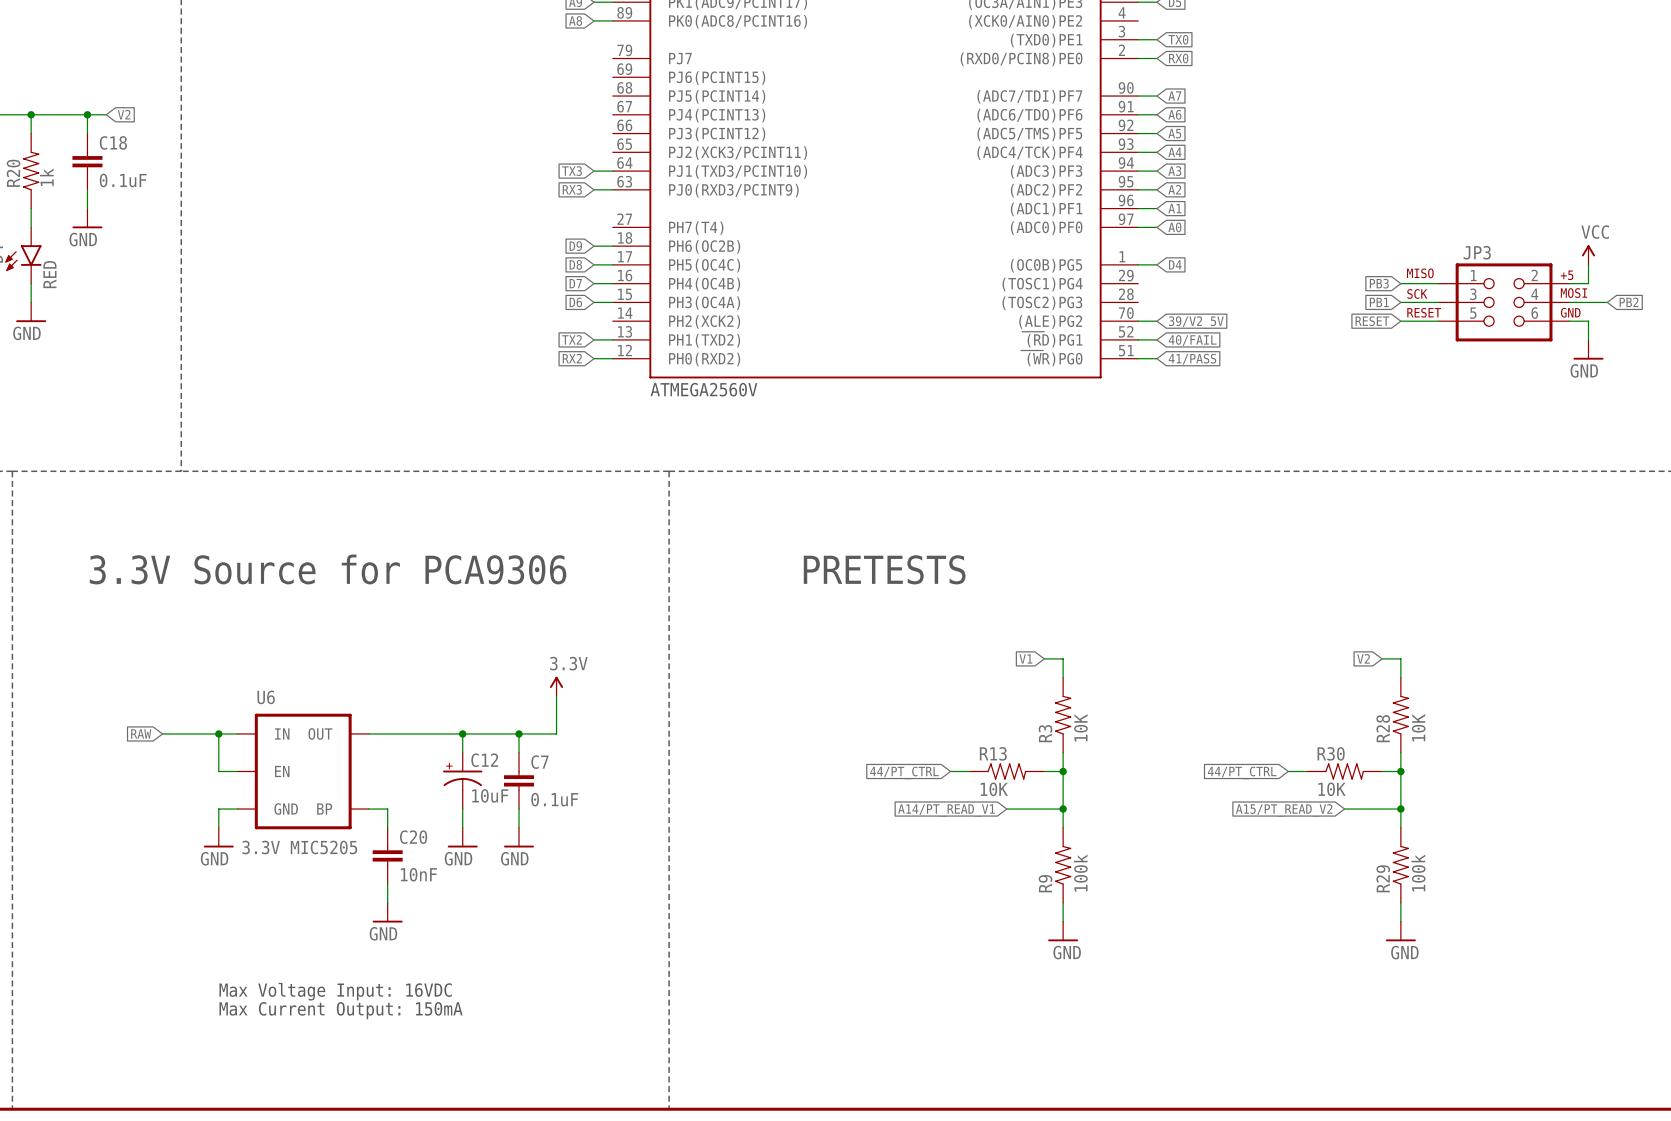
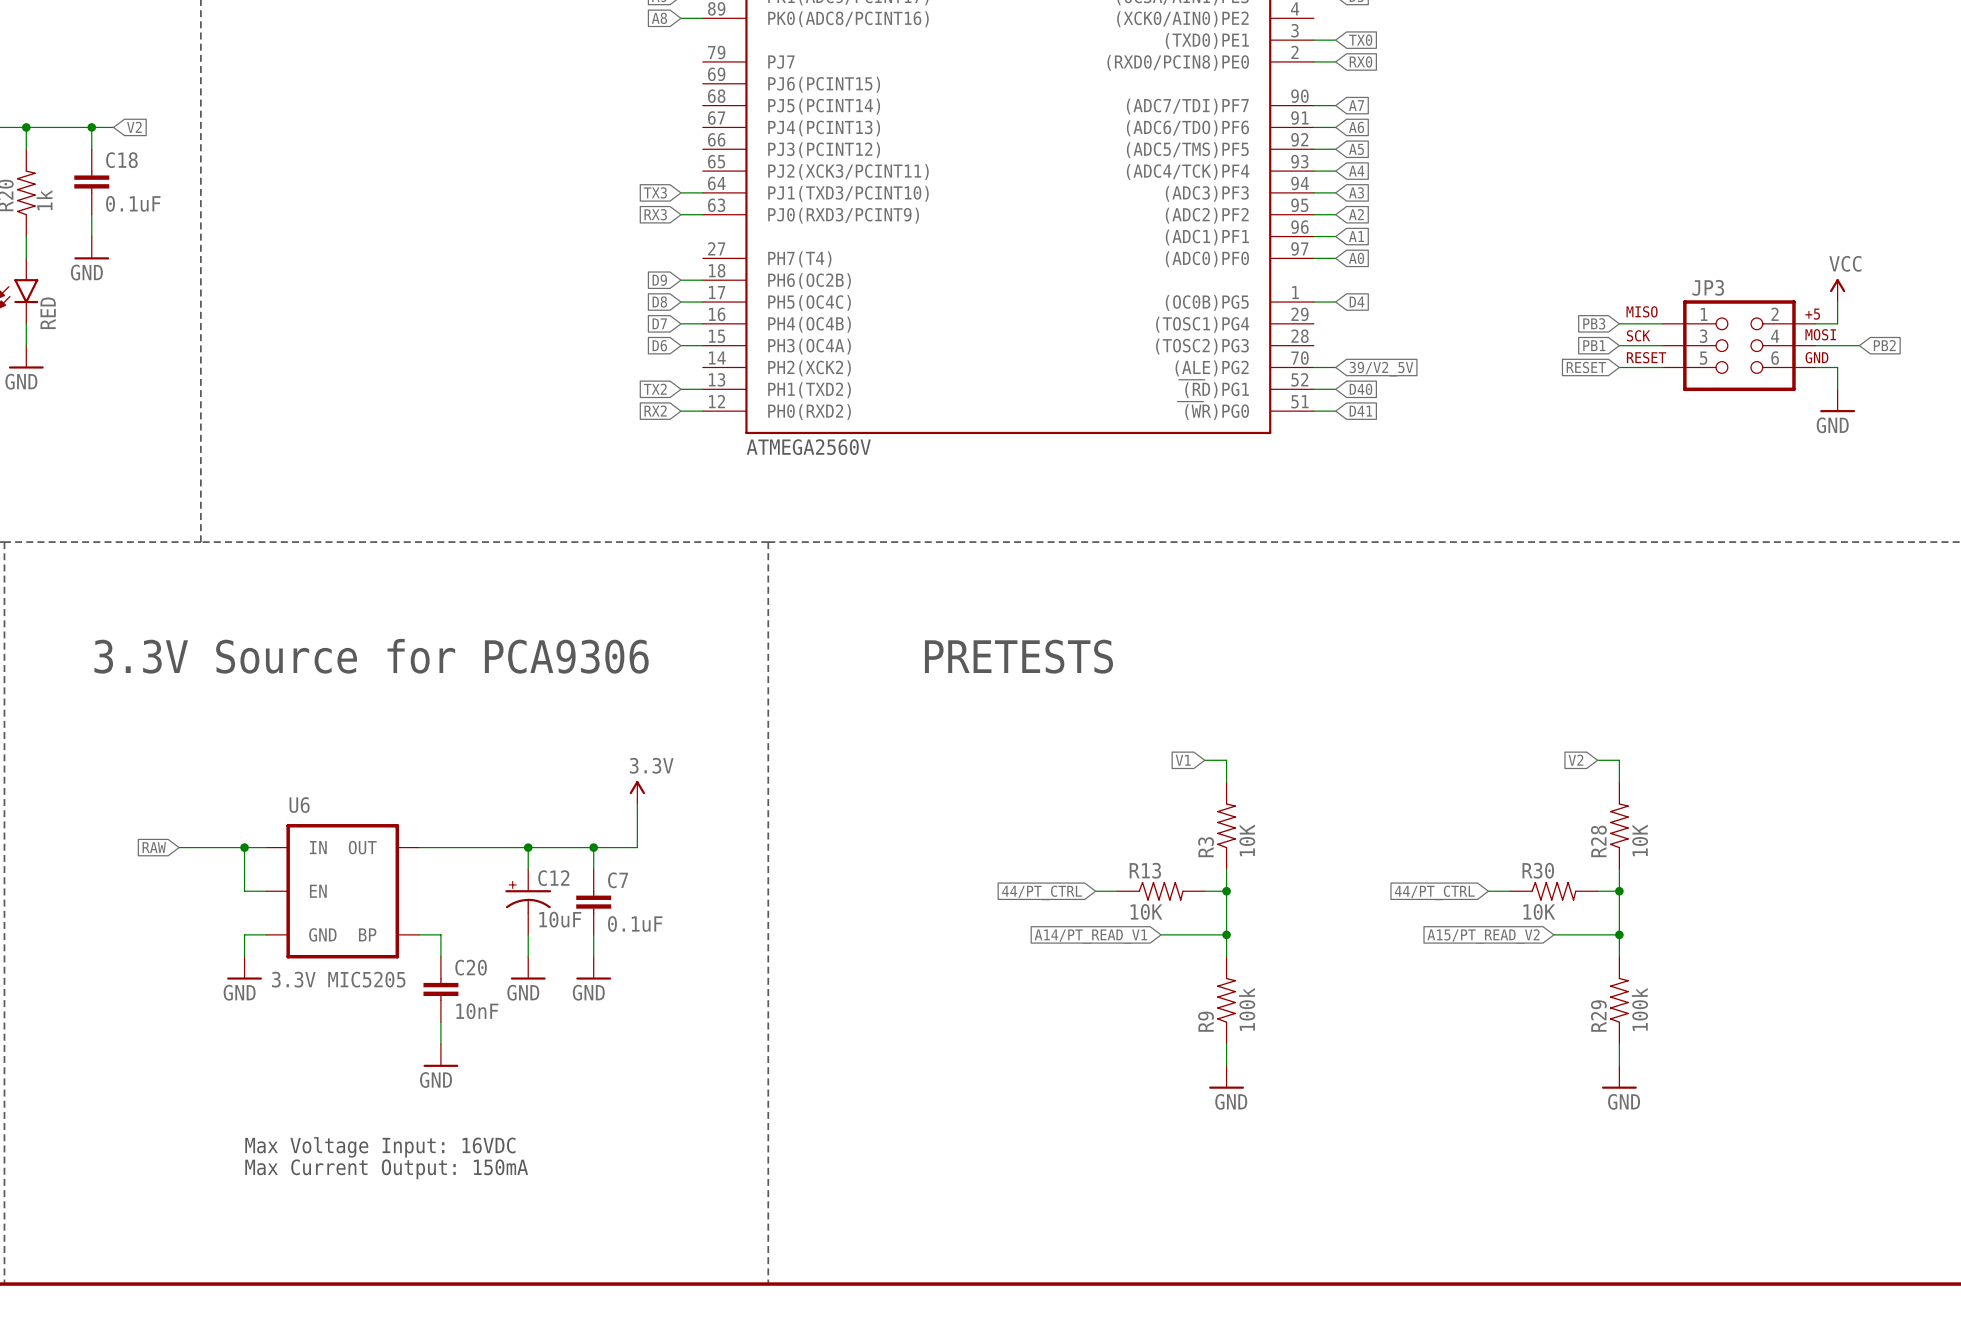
global label: 40/FAIL (1192, 340) -> D40 (1360, 389)
global label: 41/PASS (1192, 359) -> D41 (1360, 411)

